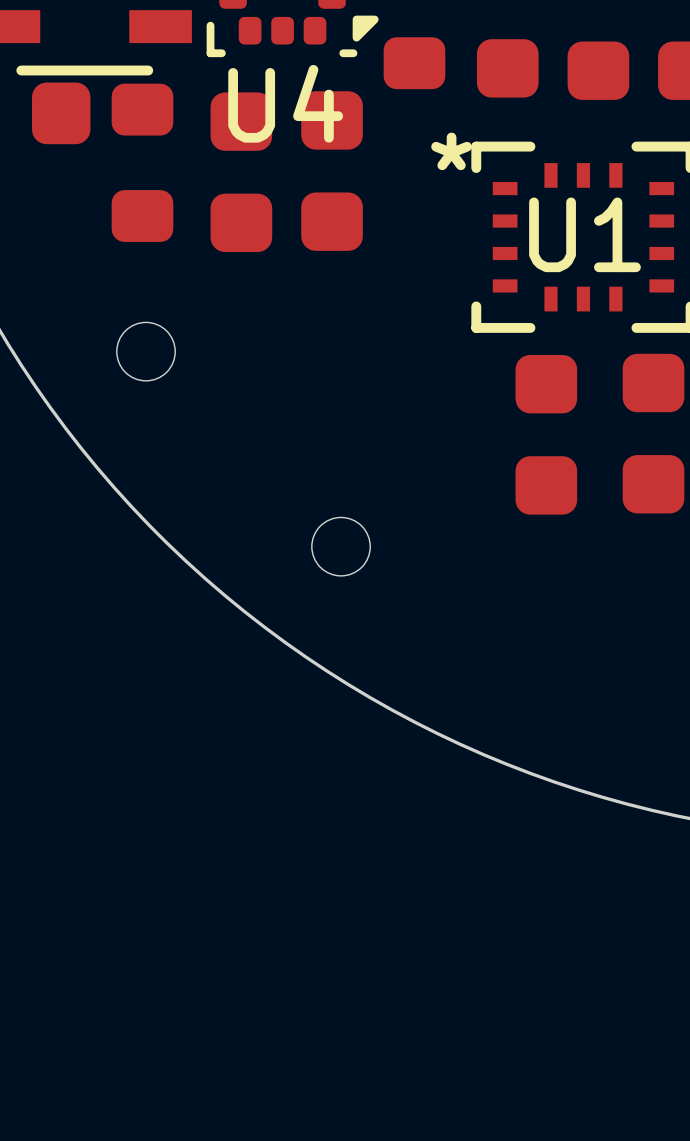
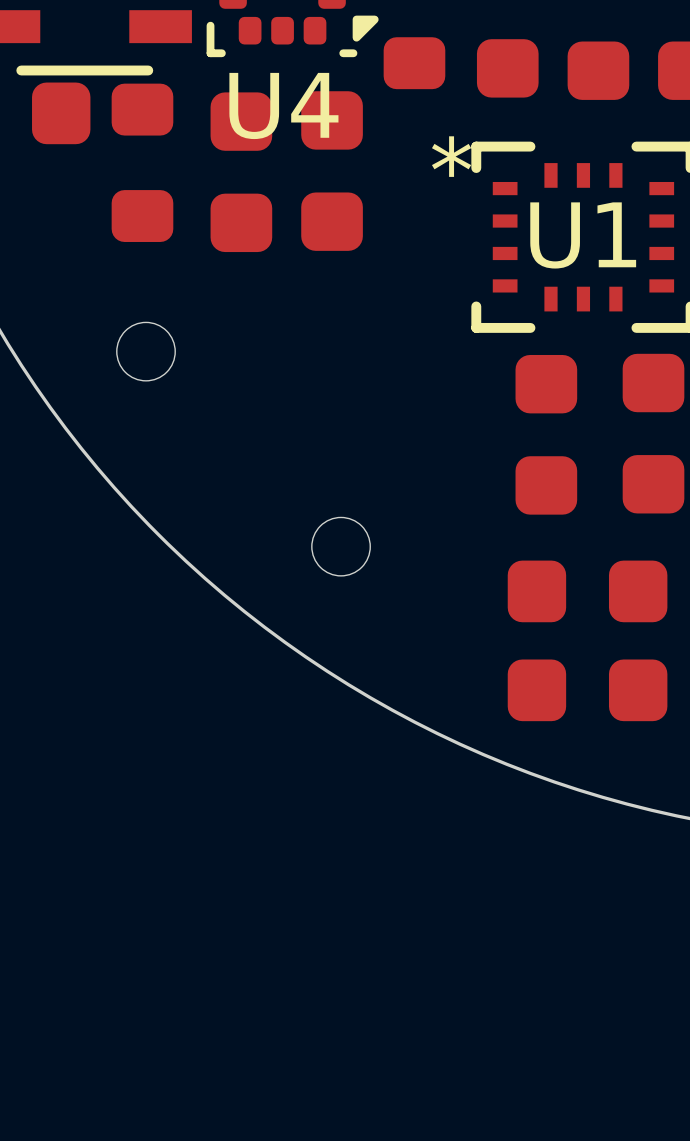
part: none -> (587, 591)
part: none -> (587, 690)

